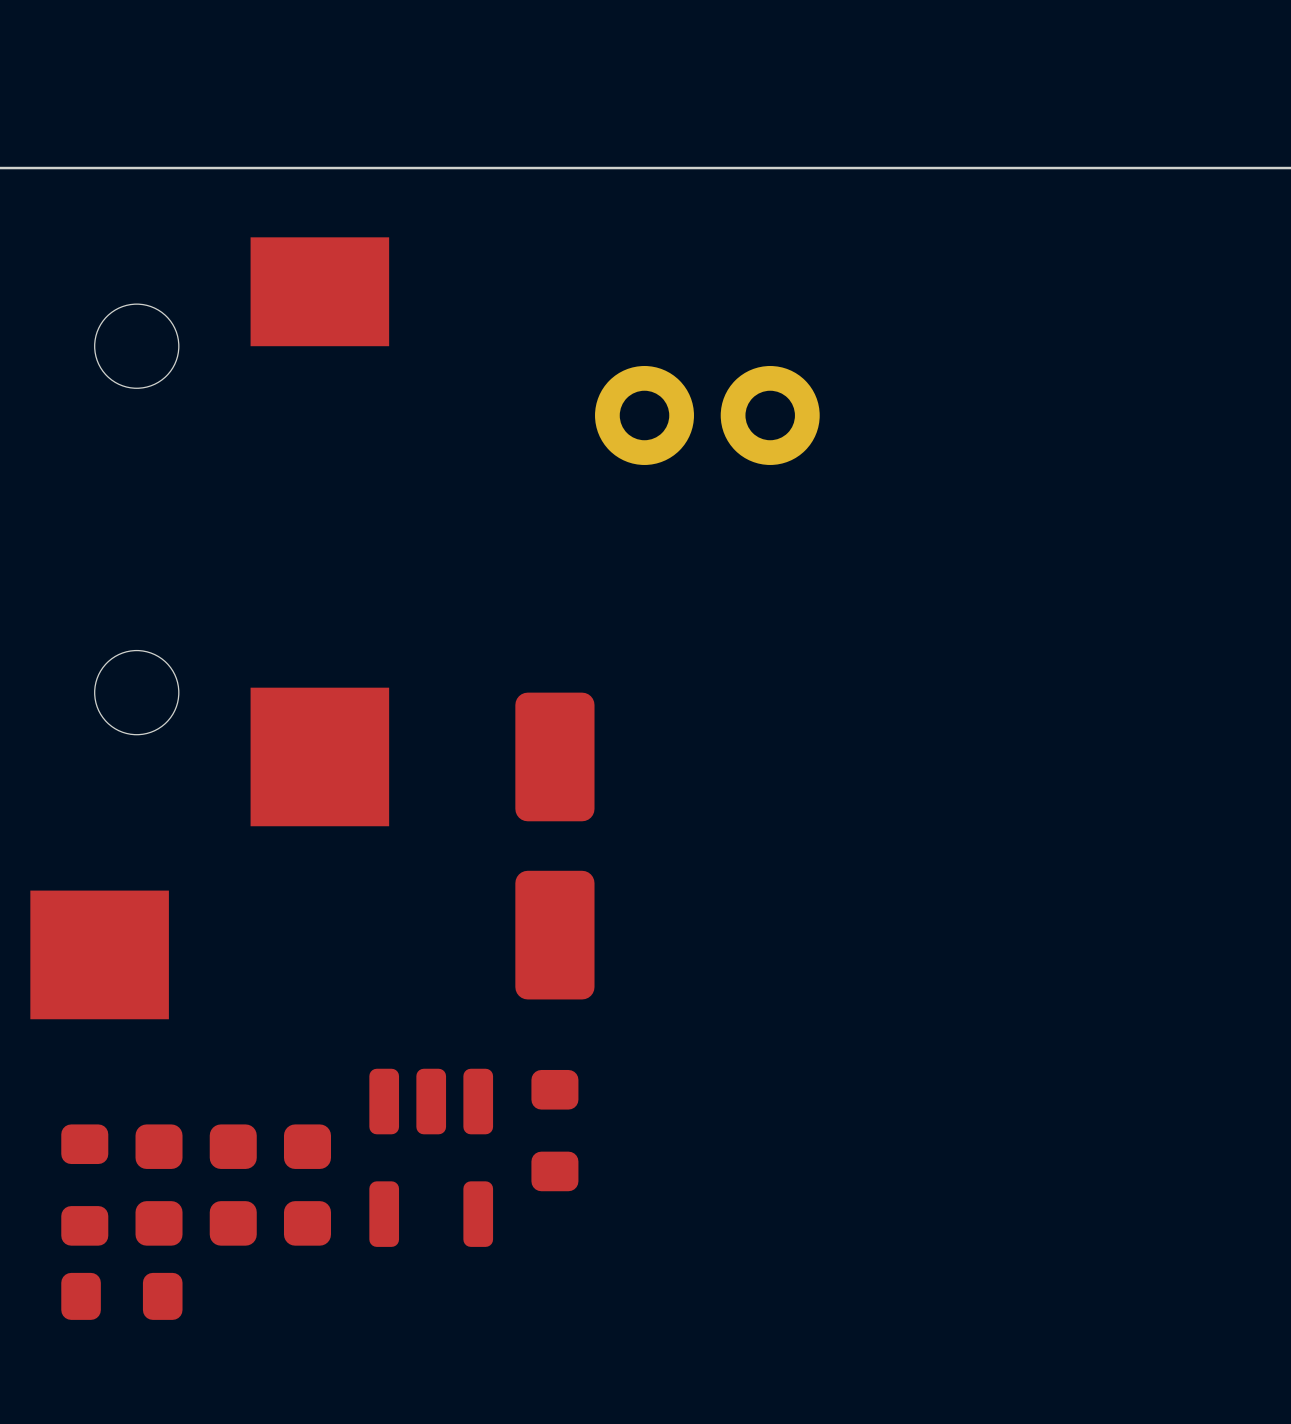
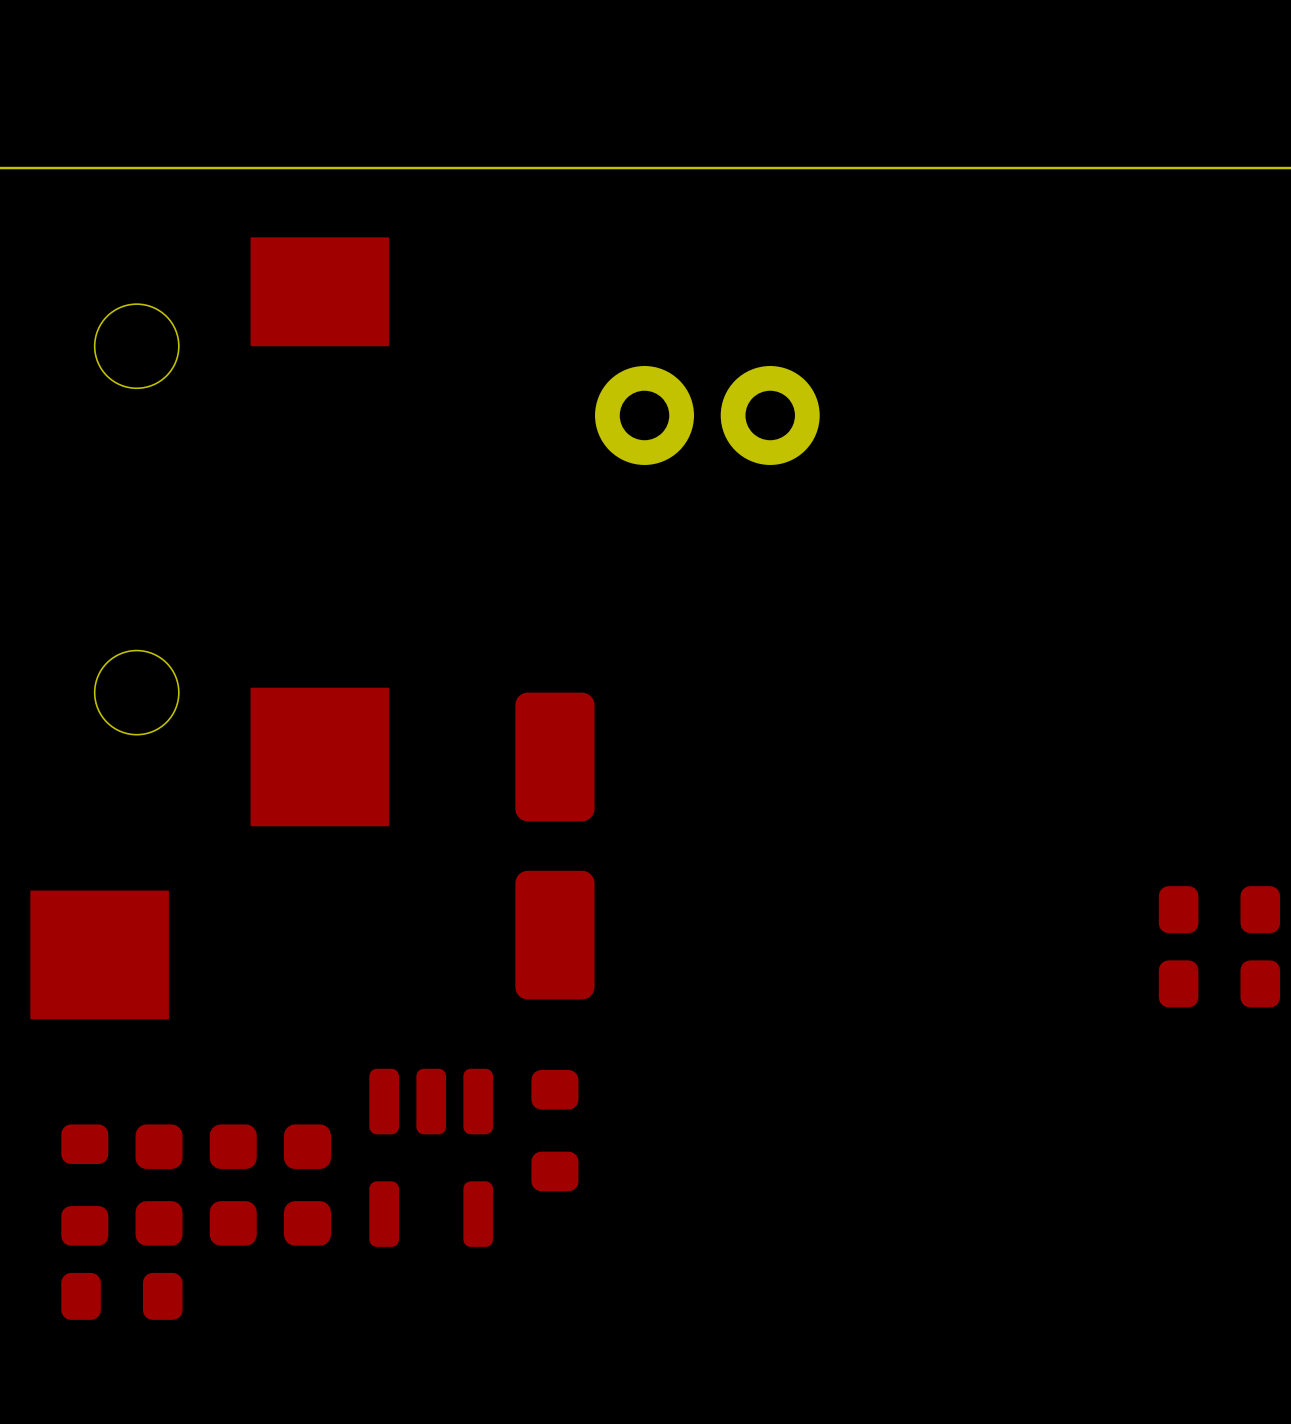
part: none -> (1219, 909)
part: none -> (1219, 983)

